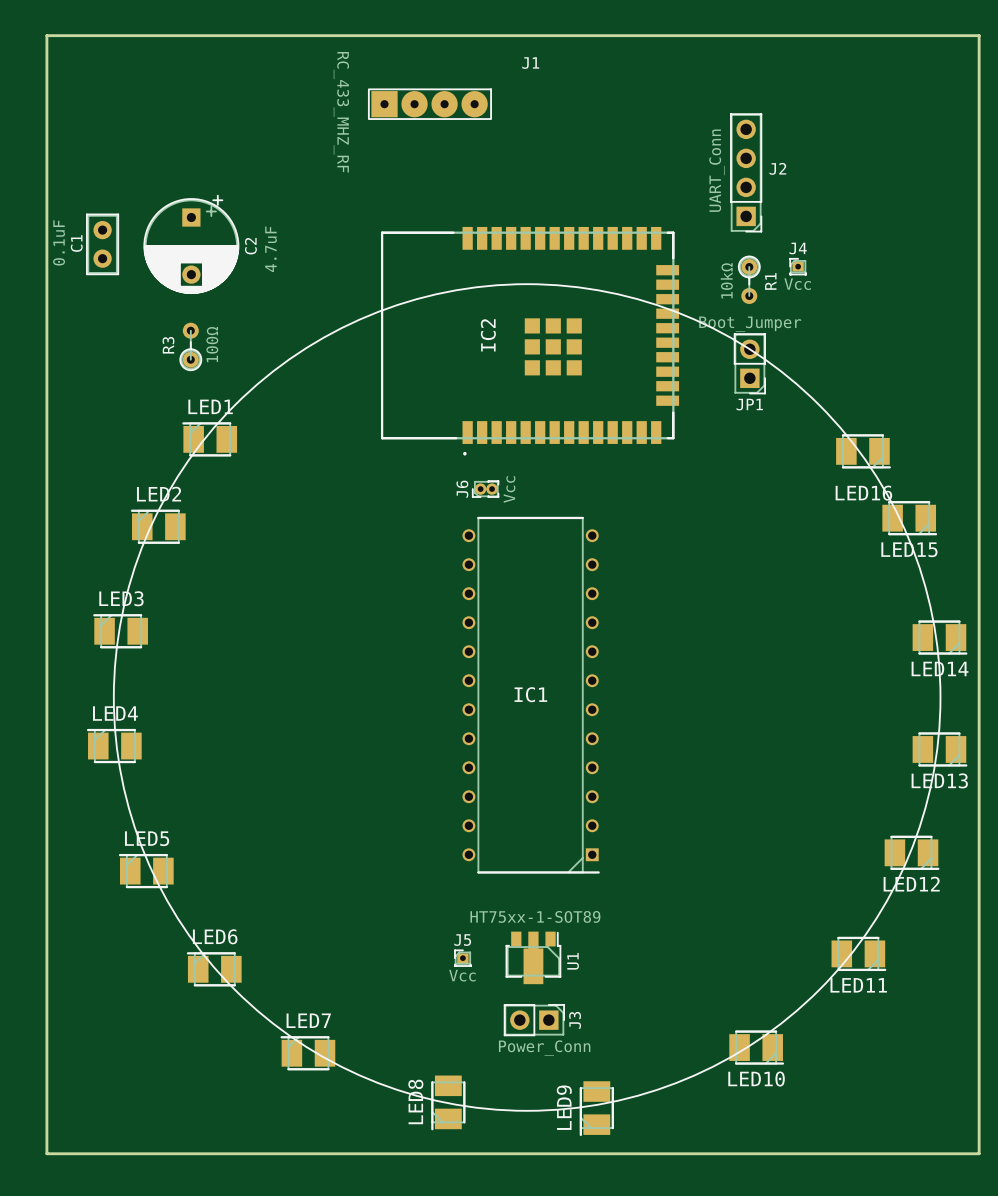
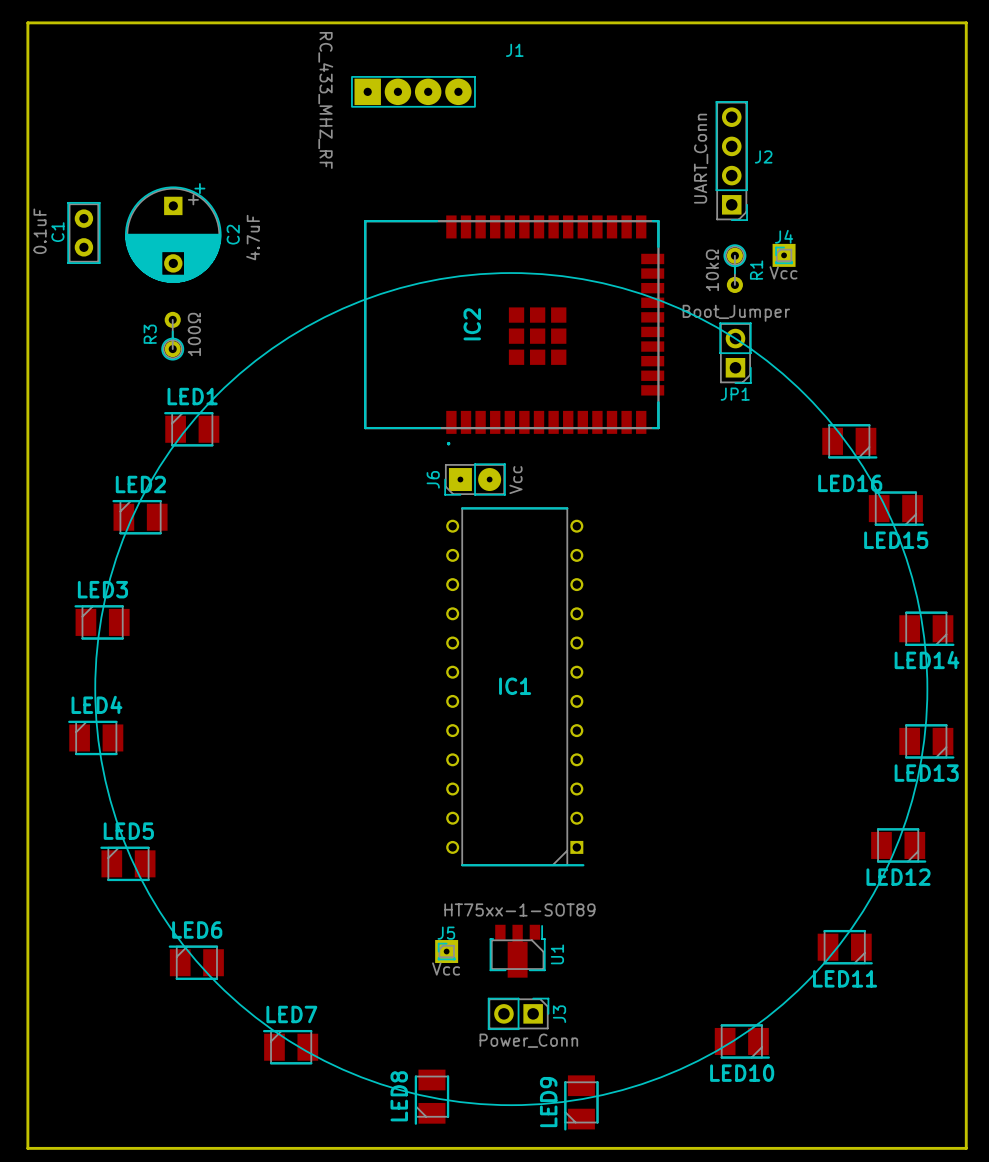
J4 footprint: [789, 258, 807, 276] -> [772, 243, 796, 267]
J6 footprint: [472, 480, 500, 498] -> [444, 463, 506, 496]
J5 footprint: [454, 949, 472, 967] -> [435, 940, 459, 964]

